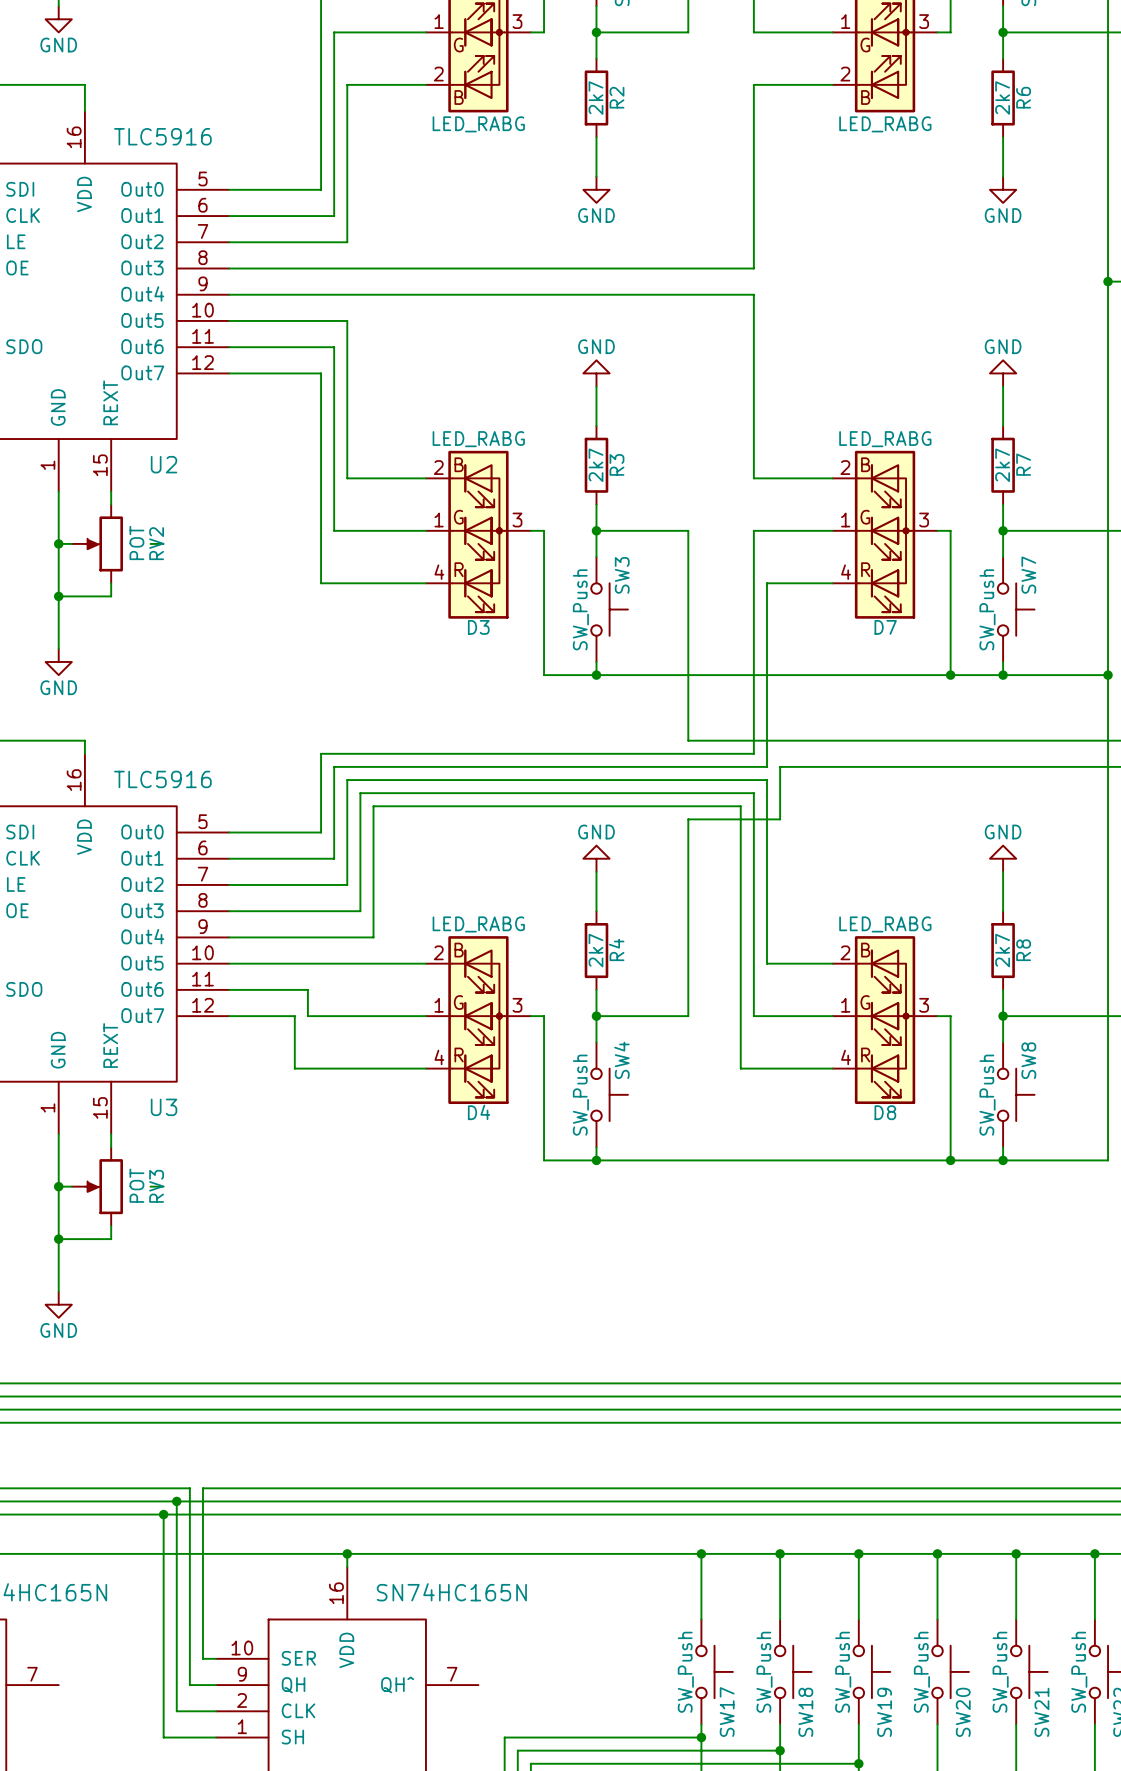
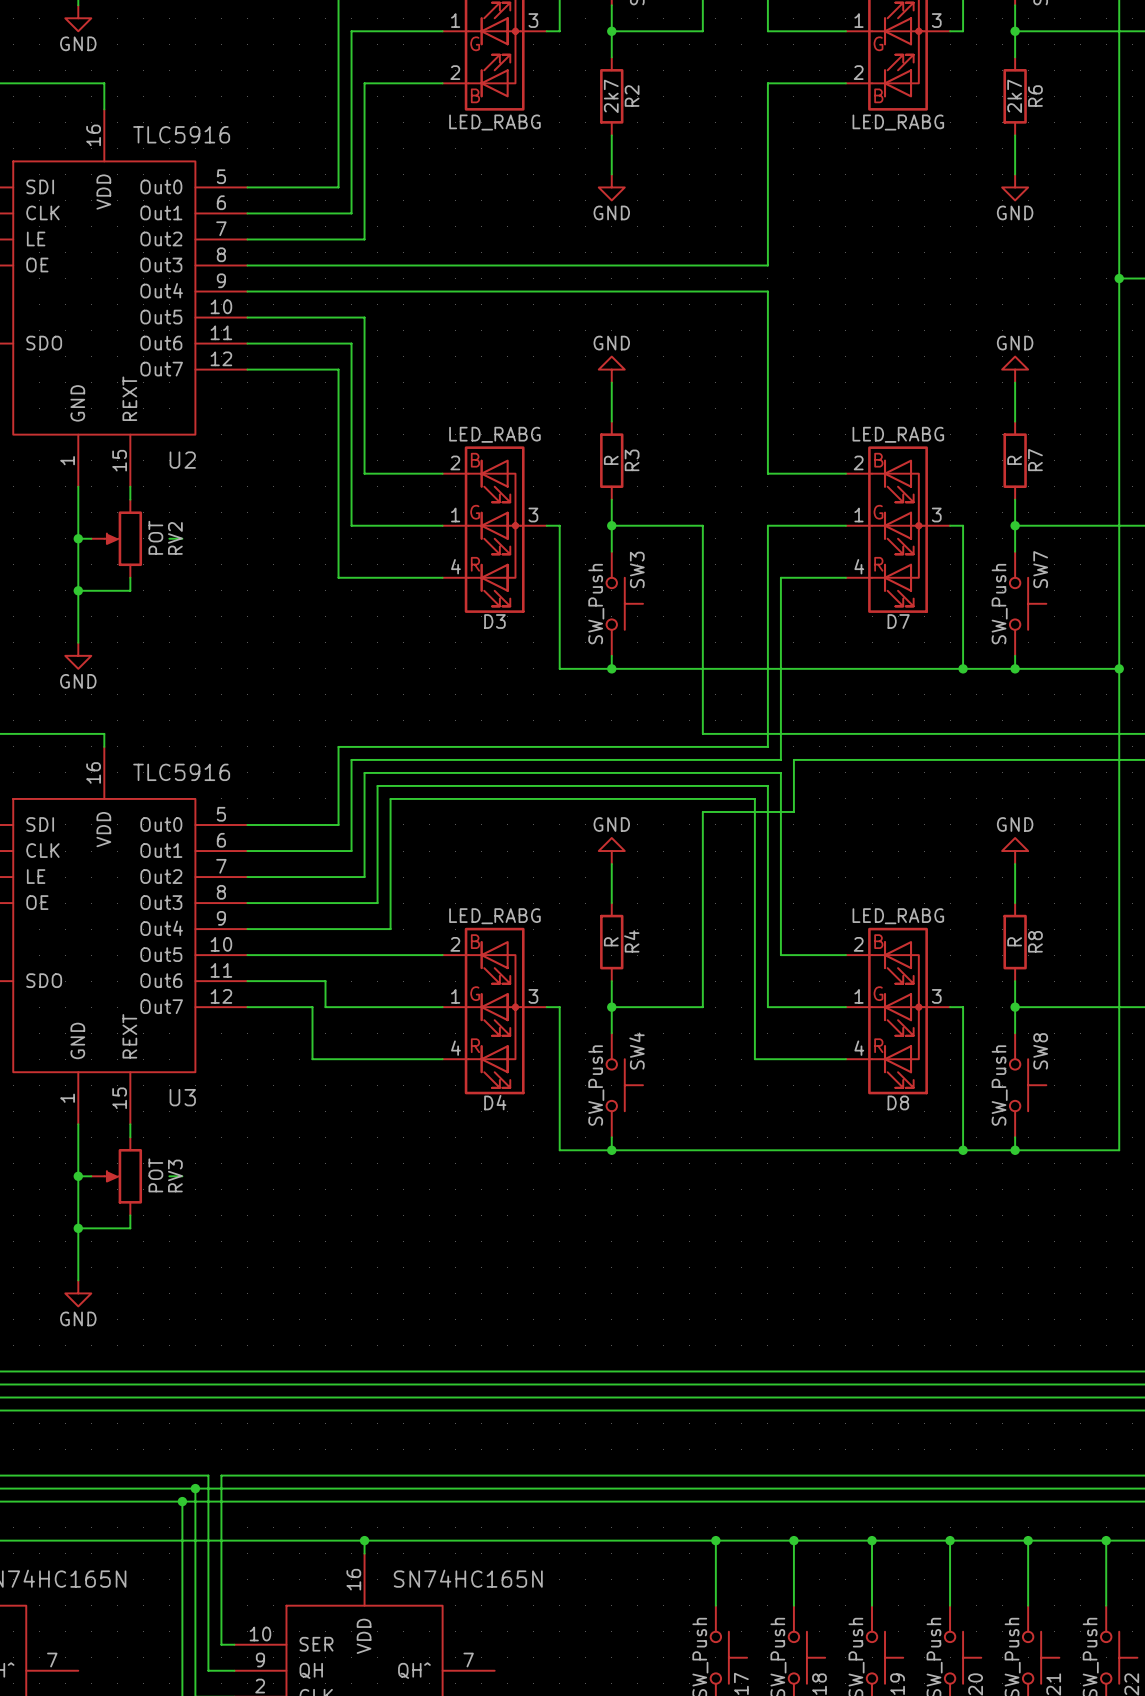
R3 value: 2k7 (595, 465) -> R (611, 460)
R7 value: 2k7 (1002, 465) -> R (1014, 460)
R4 value: 2k7 (595, 950) -> R (611, 941)
R8 value: 2k7 (1002, 950) -> R (1014, 941)

